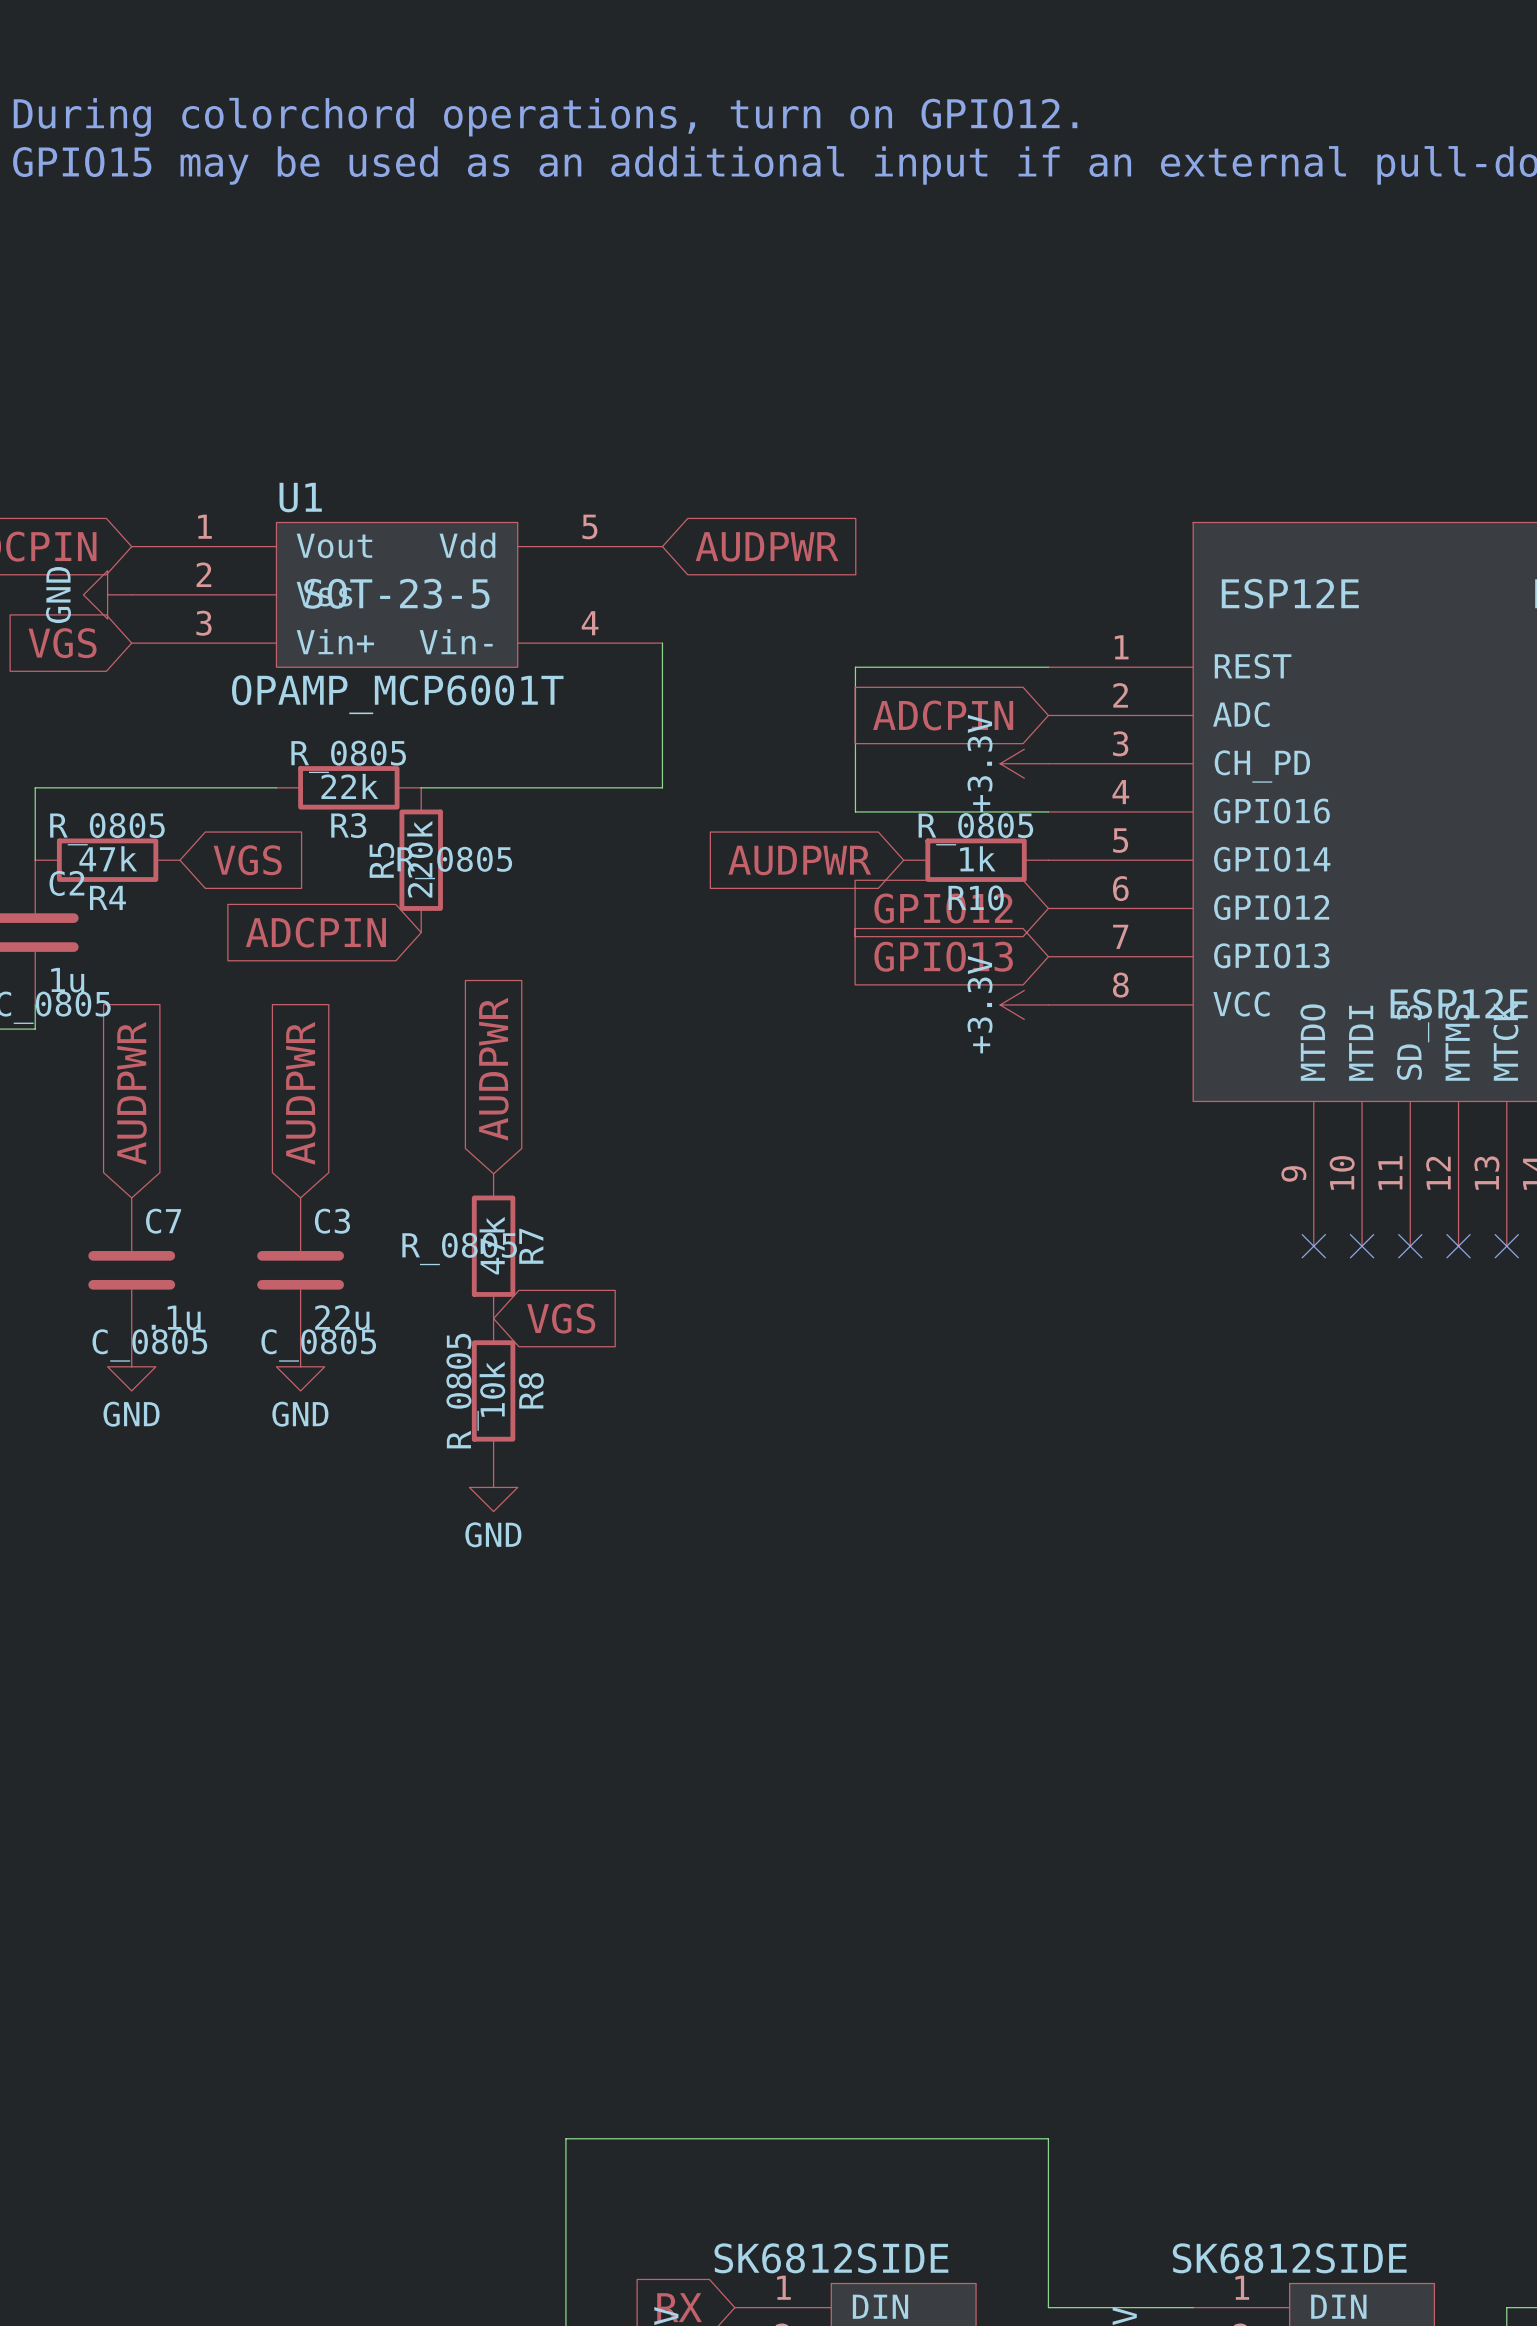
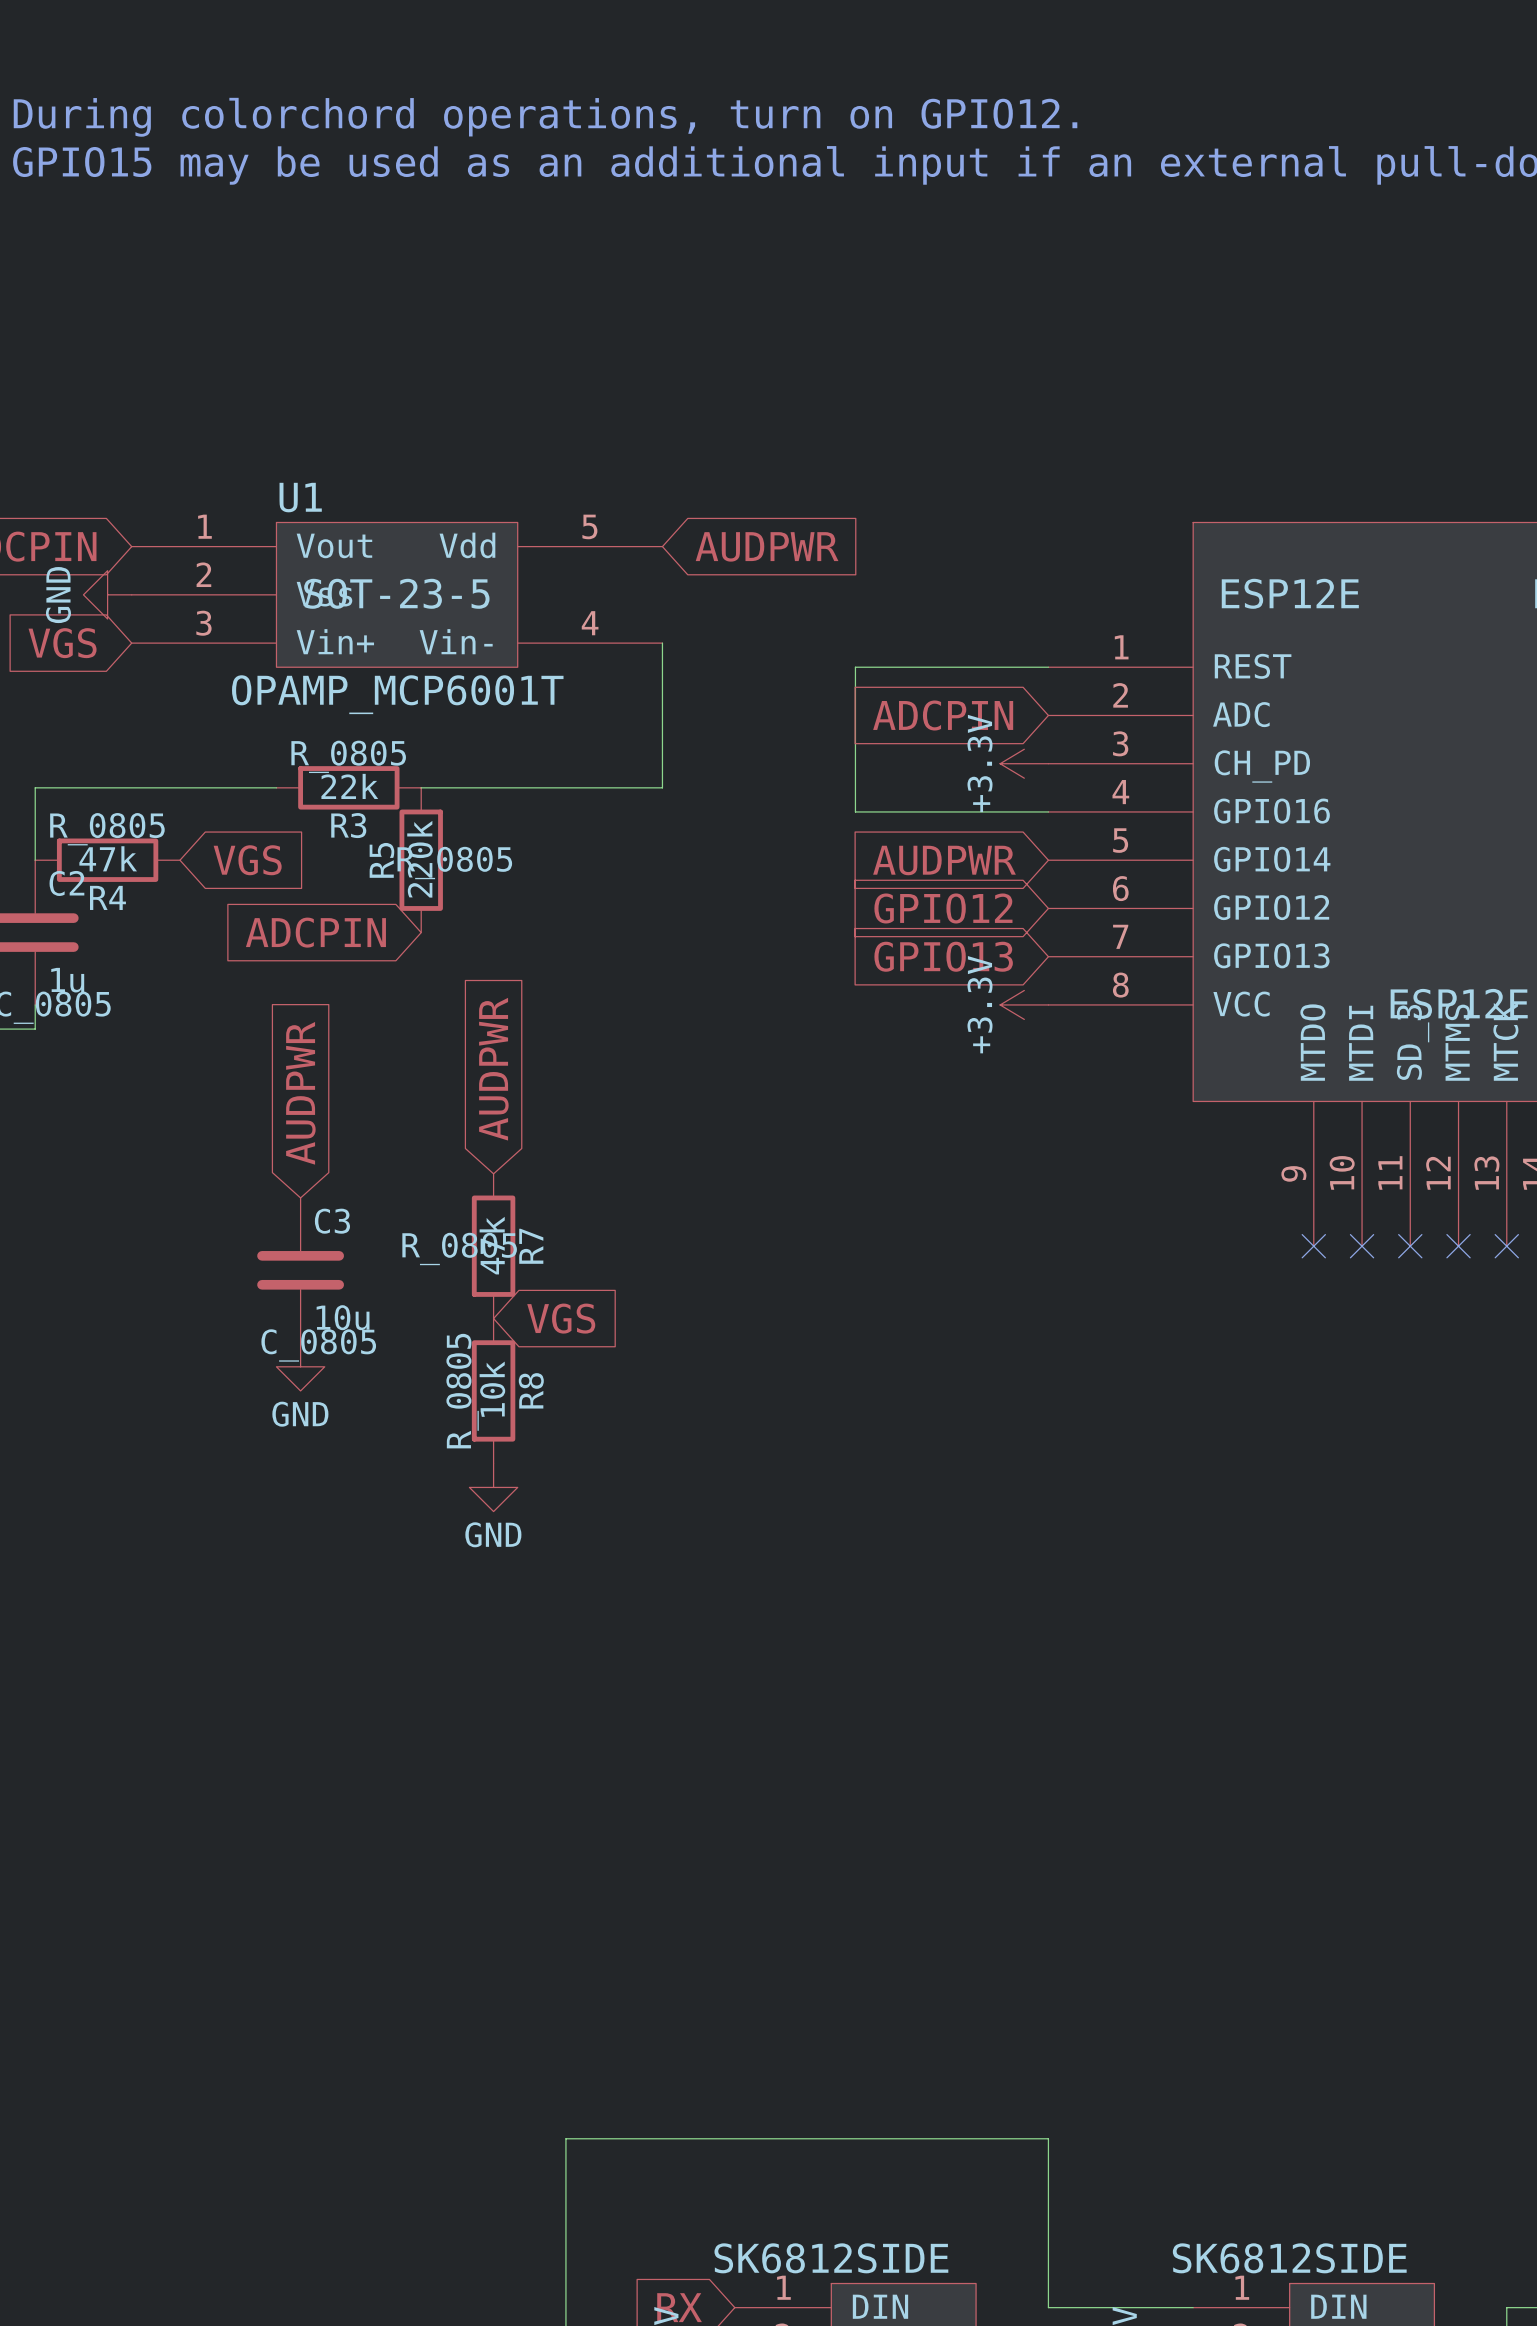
global label position: AUDPWR (799, 860) -> AUDPWR (944, 860)
R10: 1k (976, 860) -> none
global label: AUDPWR (132, 1093) -> none
C7: .1u (131, 1270) -> none
C3 value: 22u (342, 1317) -> 10u (343, 1317)
power symbol: GND (131, 1366) -> none

